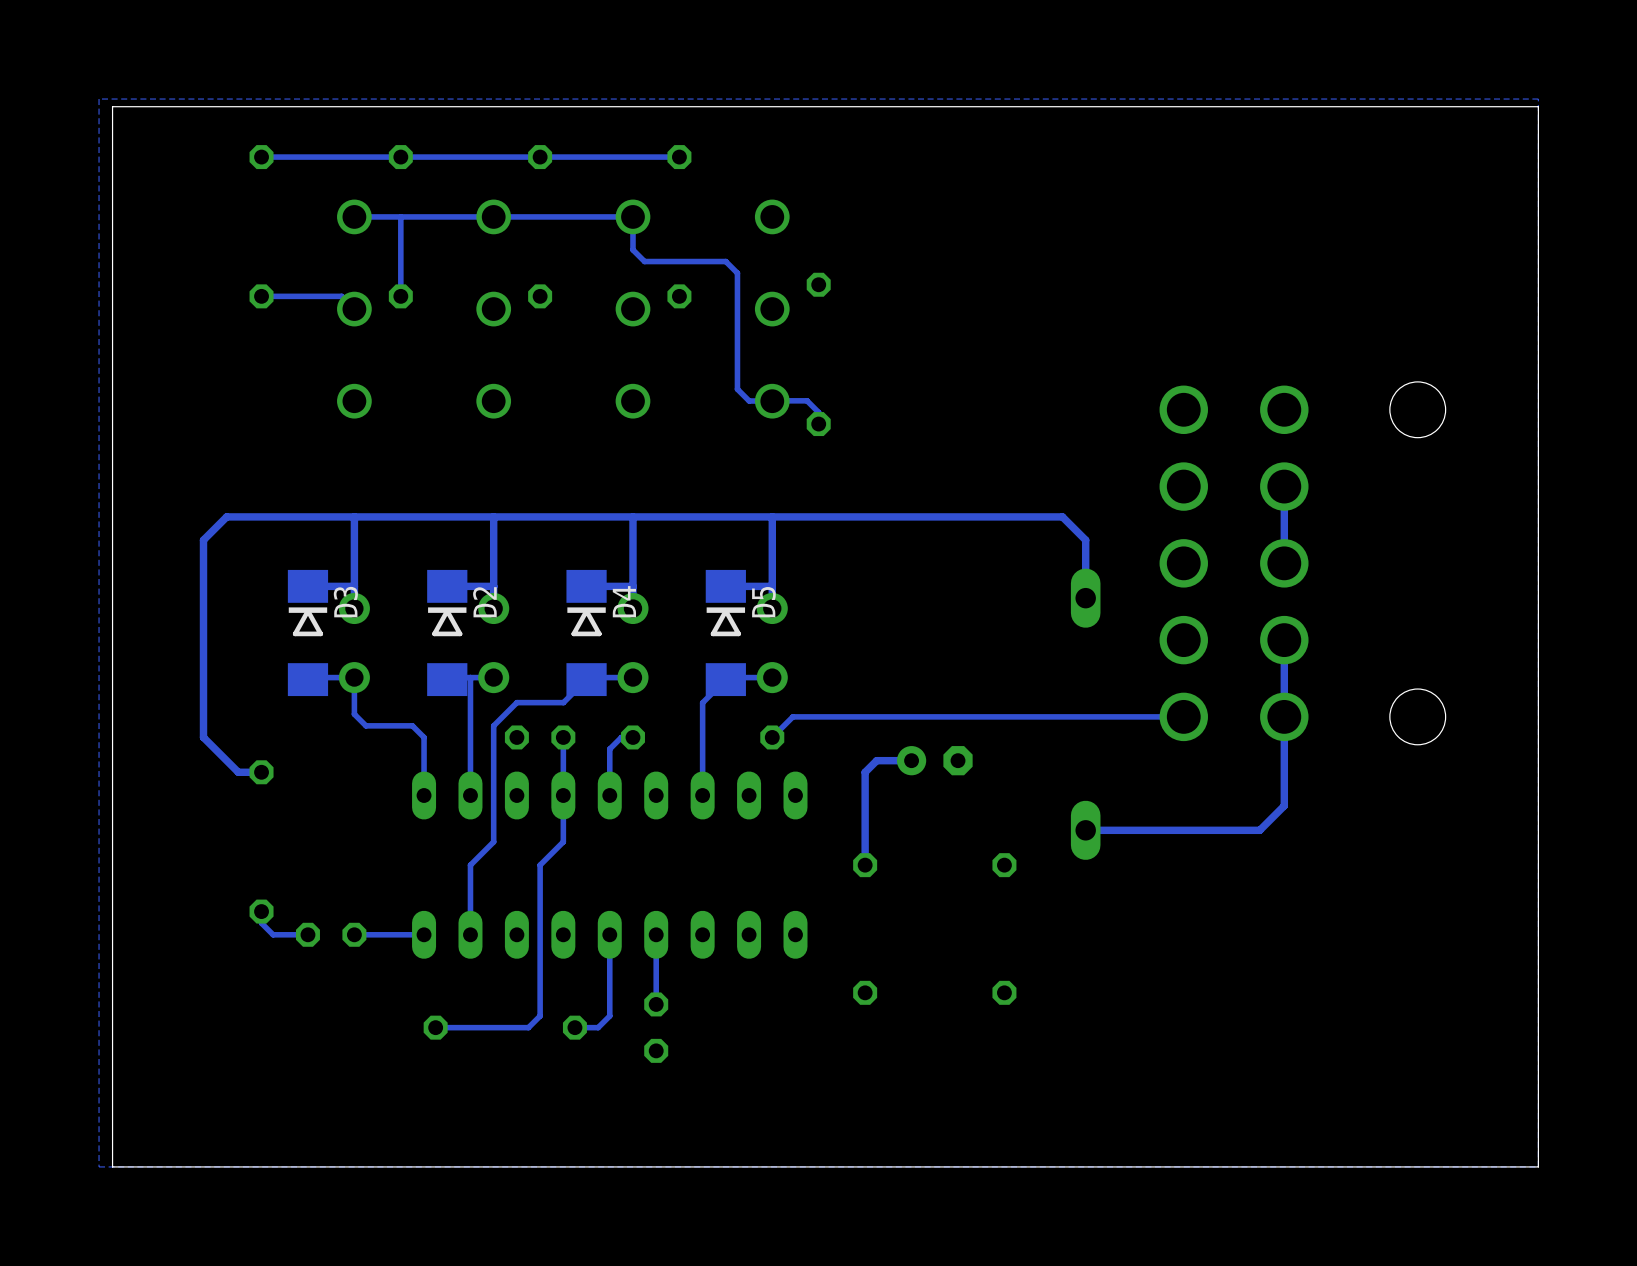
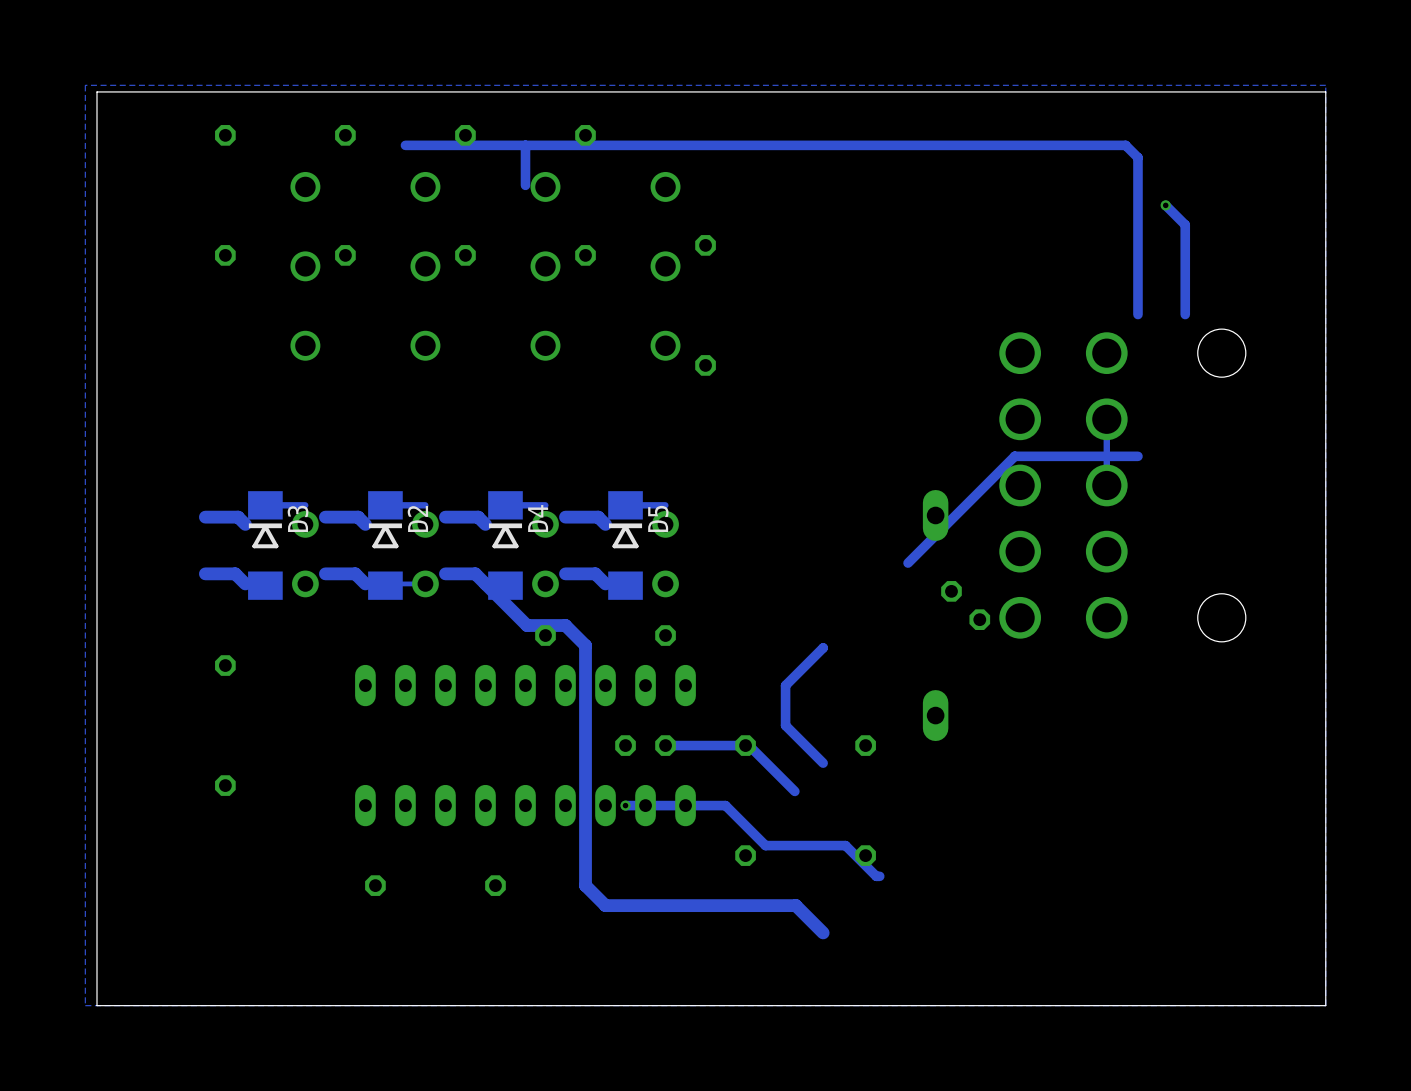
track: (679, 157) (261, 157) -> none
track: none -> (405, 145) (1125, 145) (1137, 157) (1137, 314)
track: none -> (525, 145) (525, 185)
track: (354, 216) (632, 216) (632, 249) (644, 261) (725, 261) (737, 273) (737, 389) (749, 401) (772, 401) -> none
track: (400, 216) (400, 296) -> none
track: none -> (1165, 205) (1185, 224) (1185, 314)
via: none -> (1165, 205)
track: (261, 296) (341, 296) (354, 309) -> none
track: (772, 401) (807, 400) (818, 412) (818, 424) -> none
track: (354, 516) (354, 608) -> none
track: (493, 516) (493, 608) -> none
track: (632, 516) (632, 608) -> none
track: (772, 516) (772, 608) -> none
track: none -> (1137, 456) (1014, 456) (908, 563)
track: (1085, 598) (1085, 540) (1062, 516) (226, 516) (203, 540) (203, 737) (238, 772) (261, 772) -> none
track: none -> (205, 517) (238, 517) (245, 524)
track: none -> (325, 517) (358, 517) (365, 524)
track: none -> (445, 517) (478, 517) (485, 524)
track: none -> (565, 517) (598, 517) (605, 524)
track: (1284, 640) (1284, 805) (1259, 830) (1085, 830) -> none
track: none -> (205, 573) (235, 573) (245, 583)
track: none -> (325, 573) (355, 573) (365, 583)
track: none -> (445, 573) (475, 573) (527, 625) (565, 625) (585, 645) (585, 885) (605, 905) (795, 905) (823, 932)
track: none -> (565, 573) (595, 573) (605, 583)
track: (470, 677) (470, 795) -> none
track: (632, 677) (588, 677) (563, 702) (516, 702) (493, 725) (493, 841) (470, 865) (470, 934) -> none
track: (772, 677) (727, 677) (702, 702) (702, 795) -> none
track: (307, 679) (309, 677) (354, 677) (354, 714) (366, 725) (412, 725) (424, 737) (424, 795) -> none
part: none -> (965, 605)
track: (1183, 716) (792, 716) (772, 737) -> none
part: (540, 737) -> none
track: (563, 737) (563, 841) (540, 865) (540, 1016) (528, 1027) (435, 1027) -> none
track: (632, 737) (621, 737) (609, 749) (609, 795) -> none
track: none -> (823, 647) (785, 685) (785, 725) (823, 763)
track: (911, 760) (876, 760) (865, 772) (865, 865) -> none
part: (934, 760) -> none
part: none -> (645, 745)
track: none -> (665, 745) (748, 745) (794, 791)
track: (261, 911) (261, 923) (273, 934) (307, 934) -> none
part: (331, 934) -> none
track: (424, 934) (354, 934) -> none
track: (609, 934) (609, 1016) (598, 1027) (574, 1027) -> none
track: (656, 934) (656, 1004) -> none
track: none -> (625, 805) (725, 805) (765, 845) (845, 845) (876, 876) (879, 876)
via: none -> (625, 805)
part: (656, 1027) -> none

